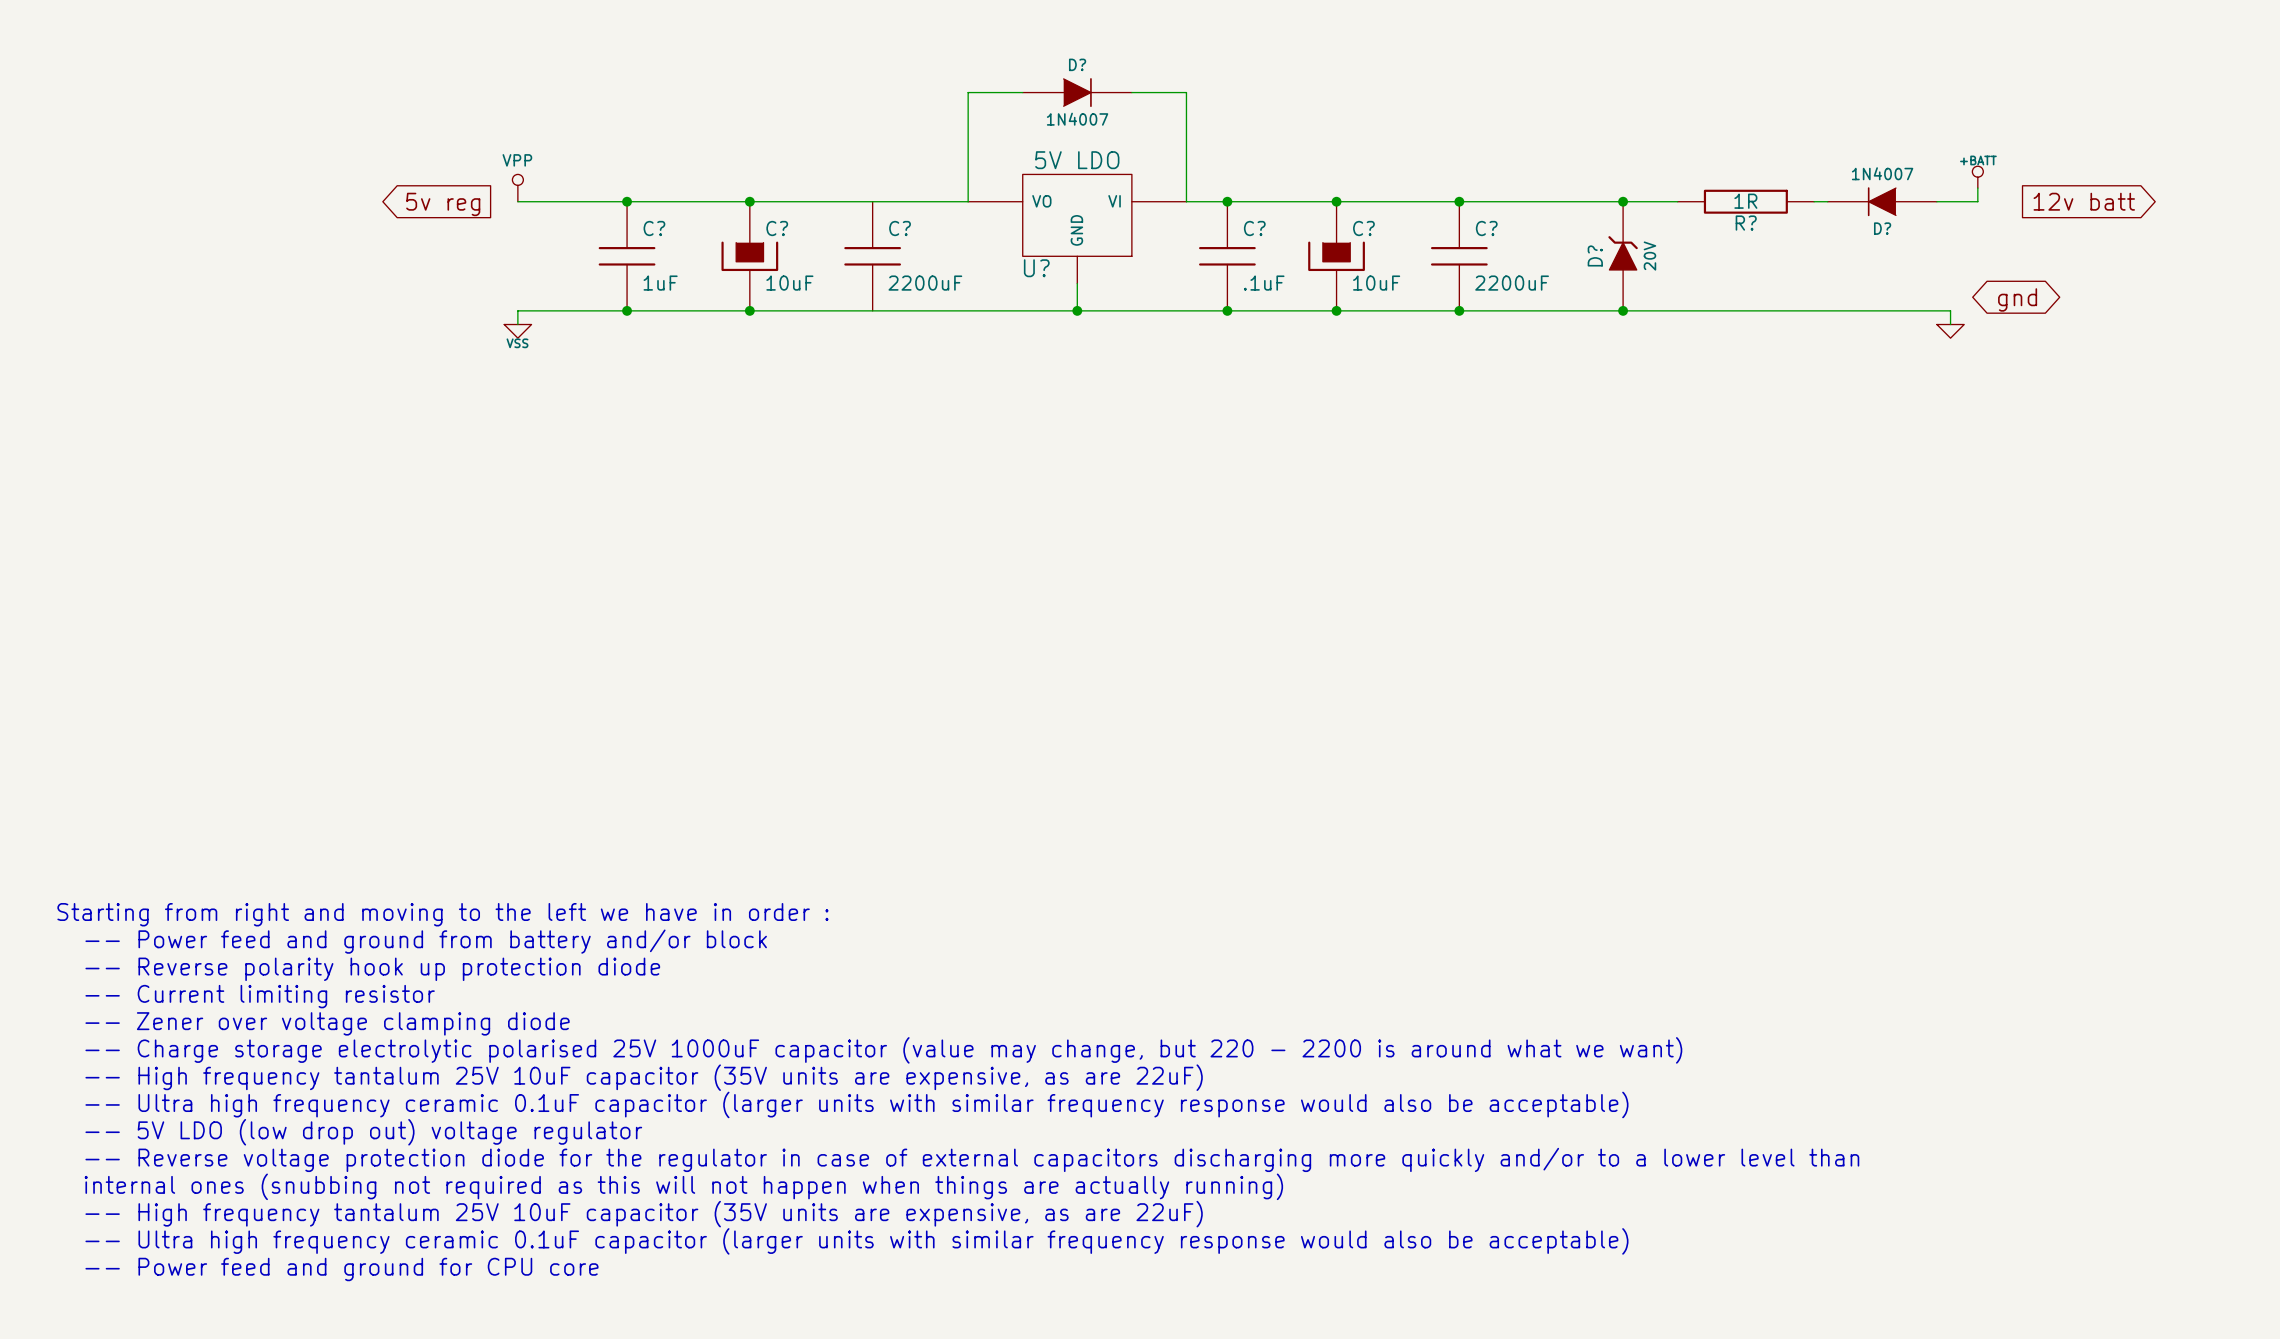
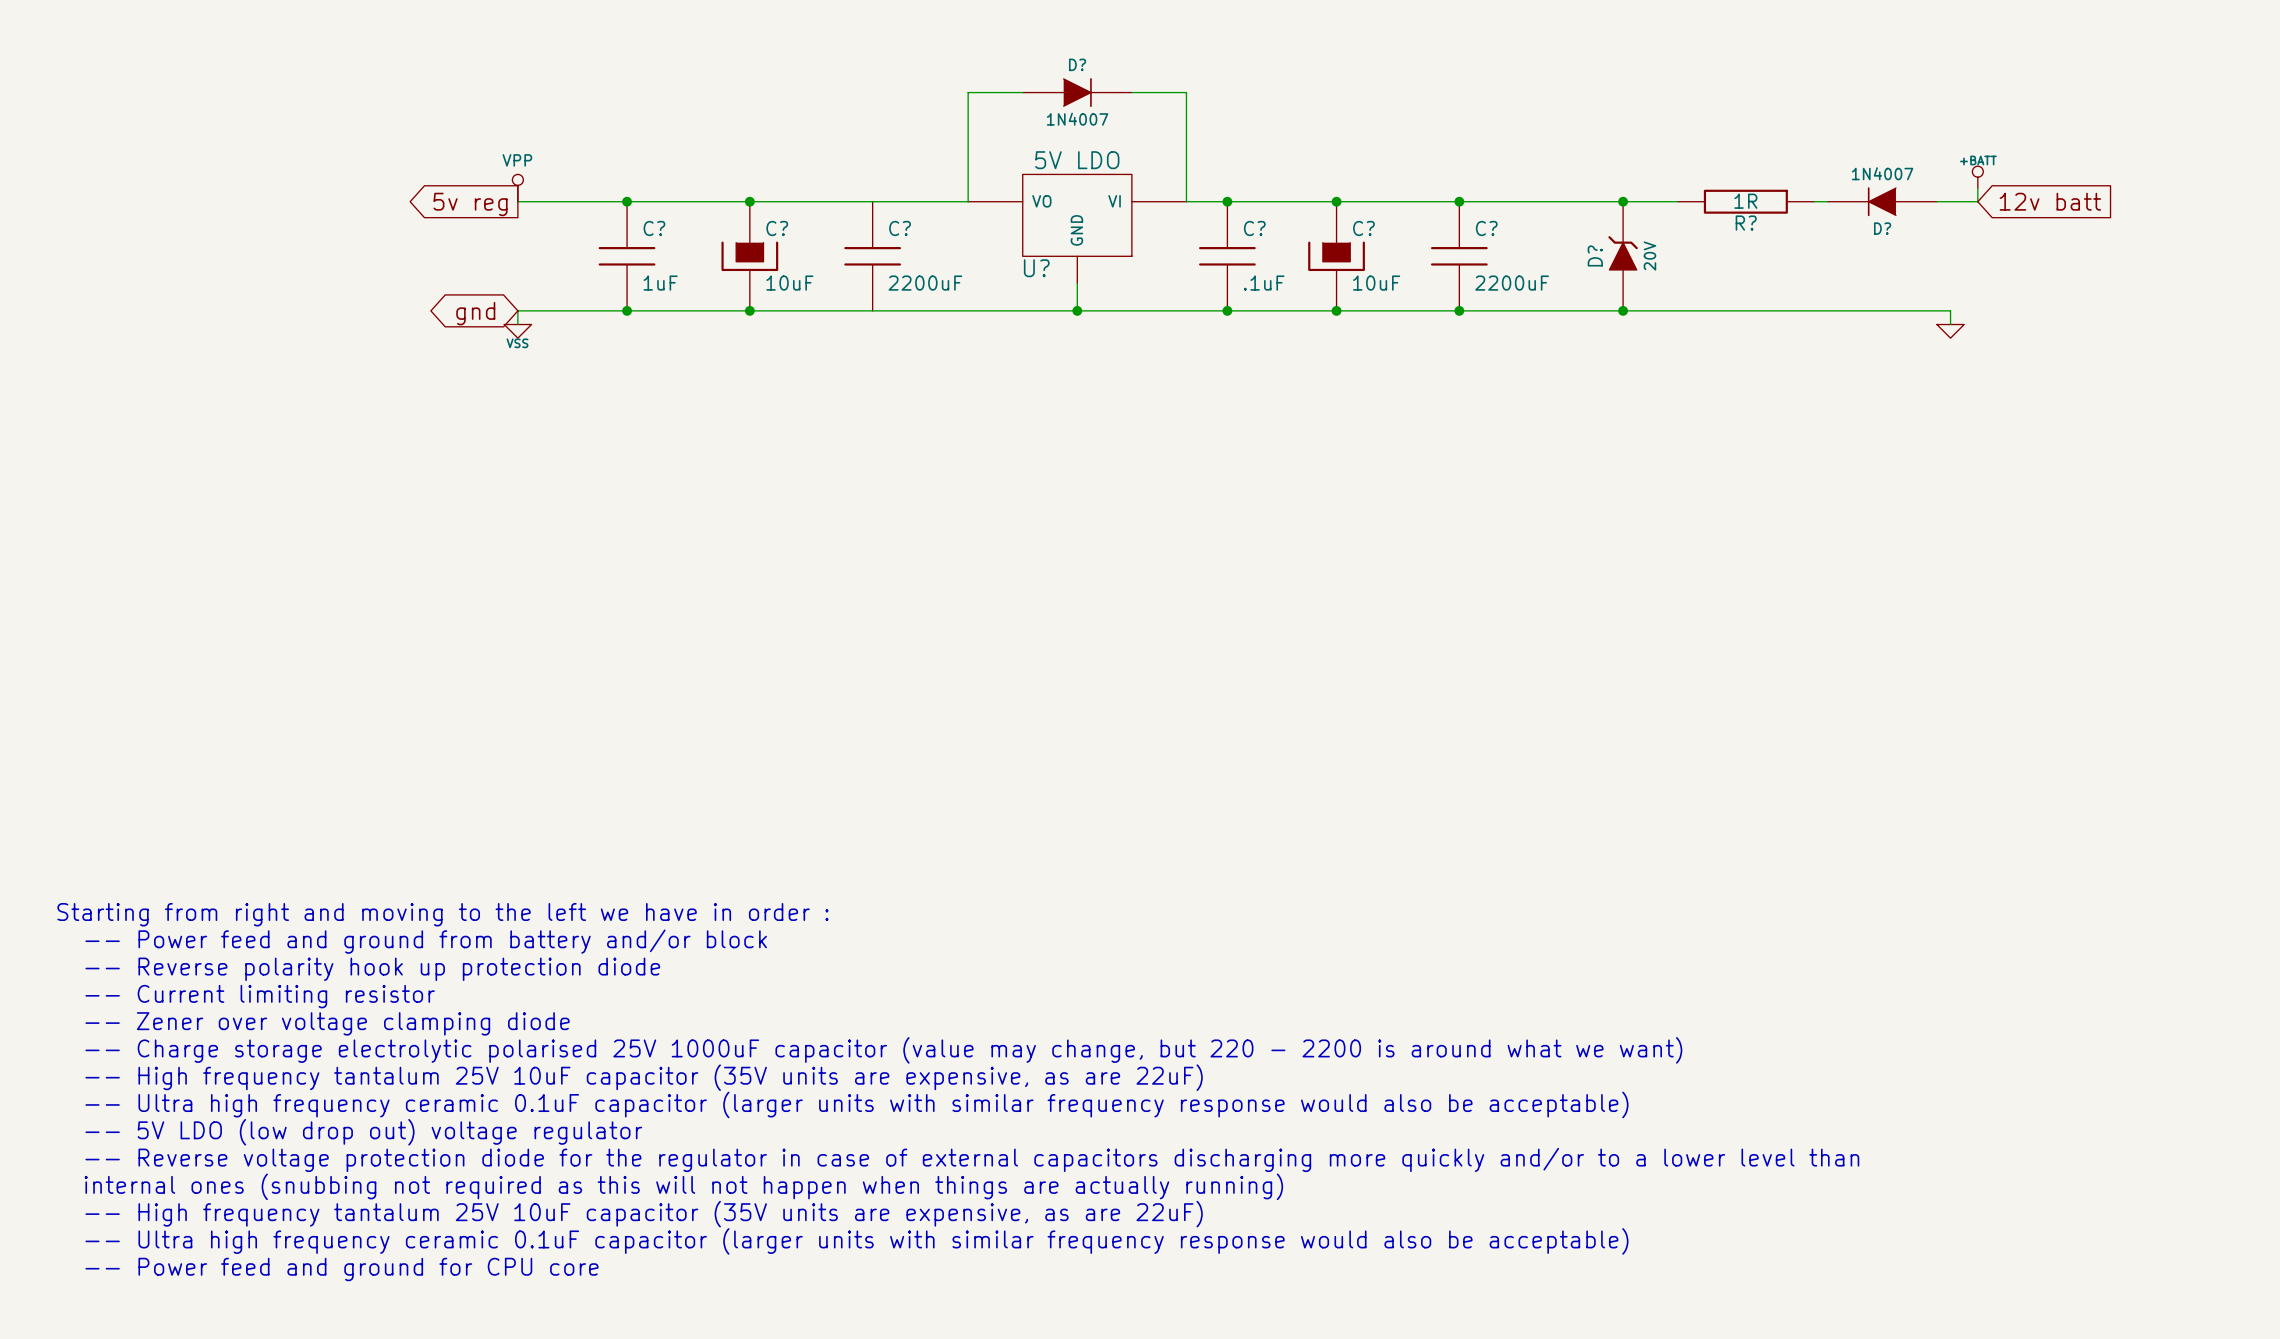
global label rotation: 0° (2084, 201) -> 180° (2050, 201)
global label position: 5v reg (443, 204) -> 5v reg (470, 204)
global label: gnd (2017, 299) -> none
global label: none -> gnd (475, 313)

